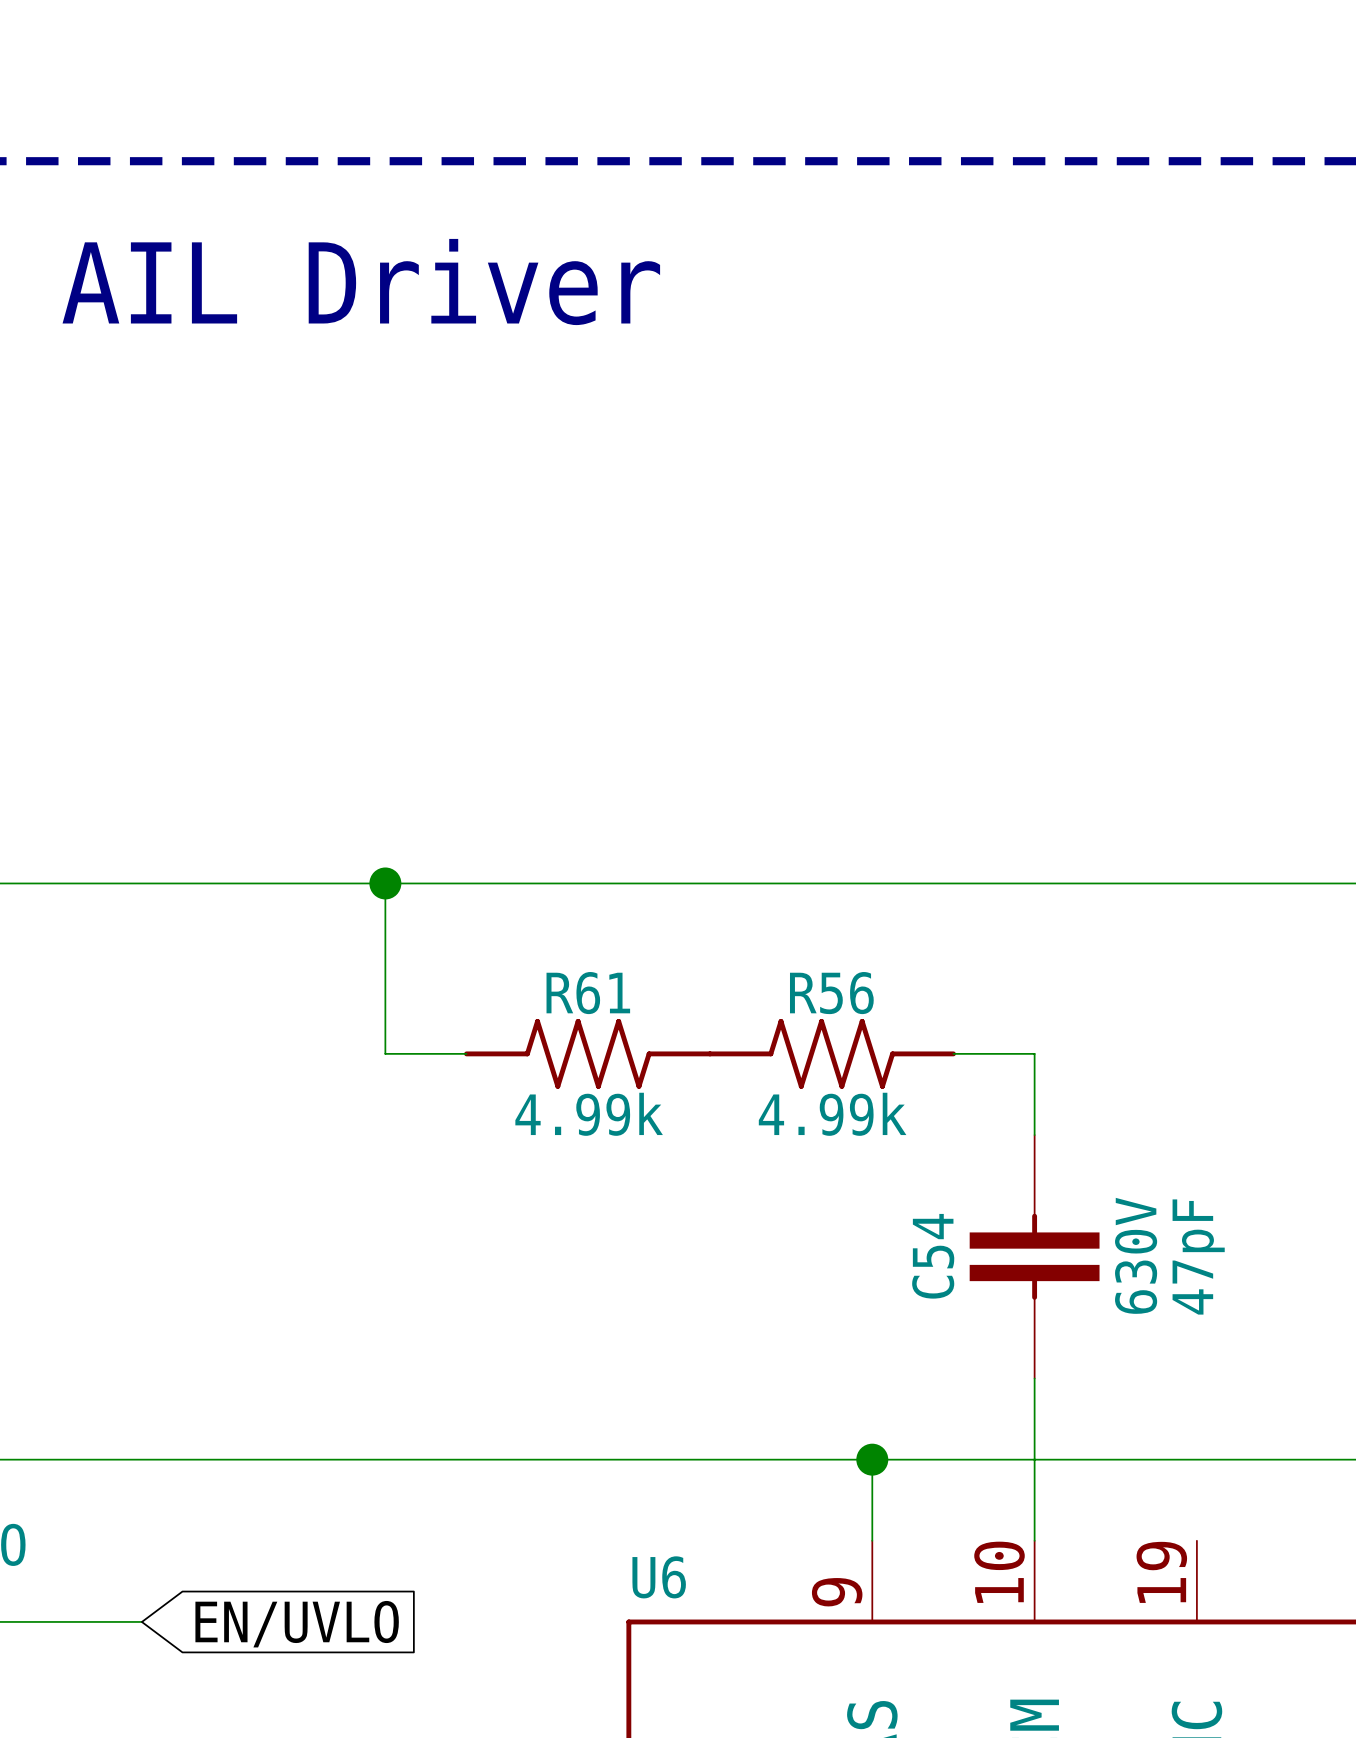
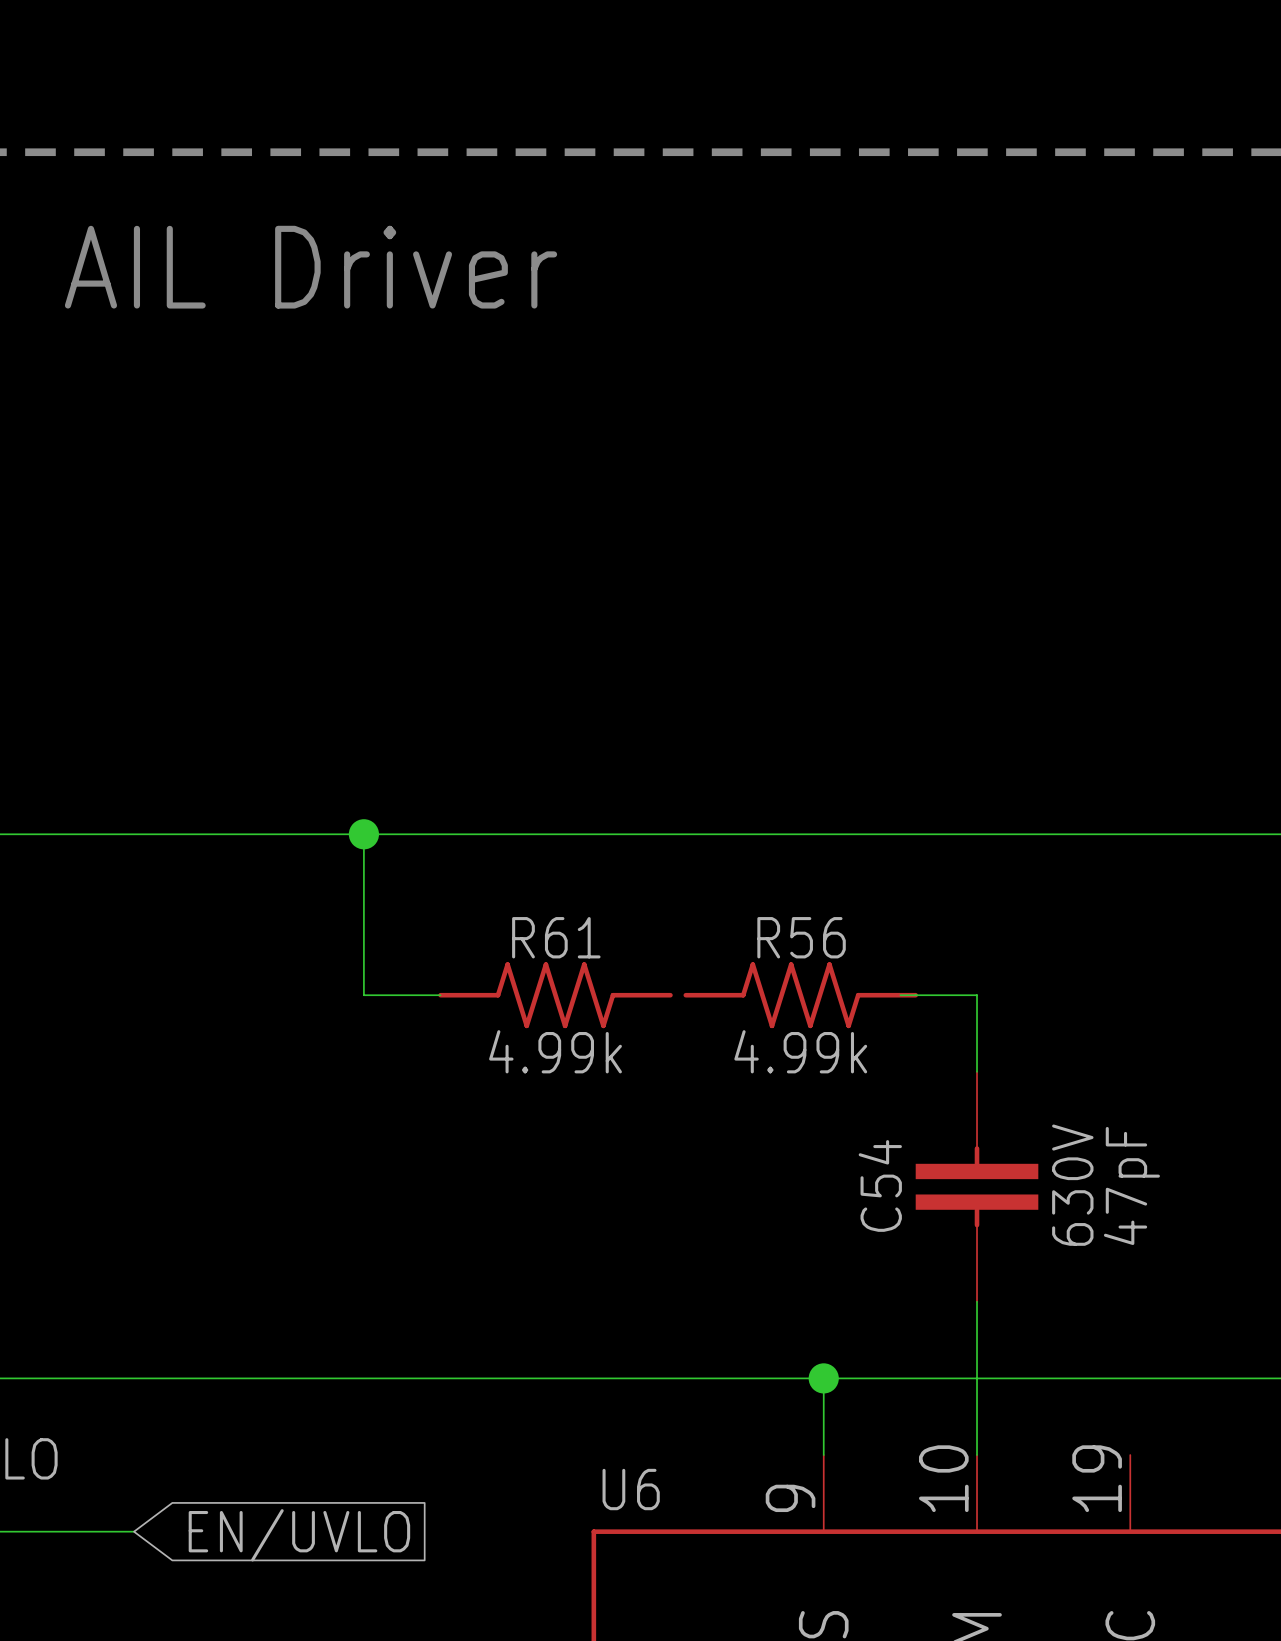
R56 position: (831, 1053) -> (800, 995)

